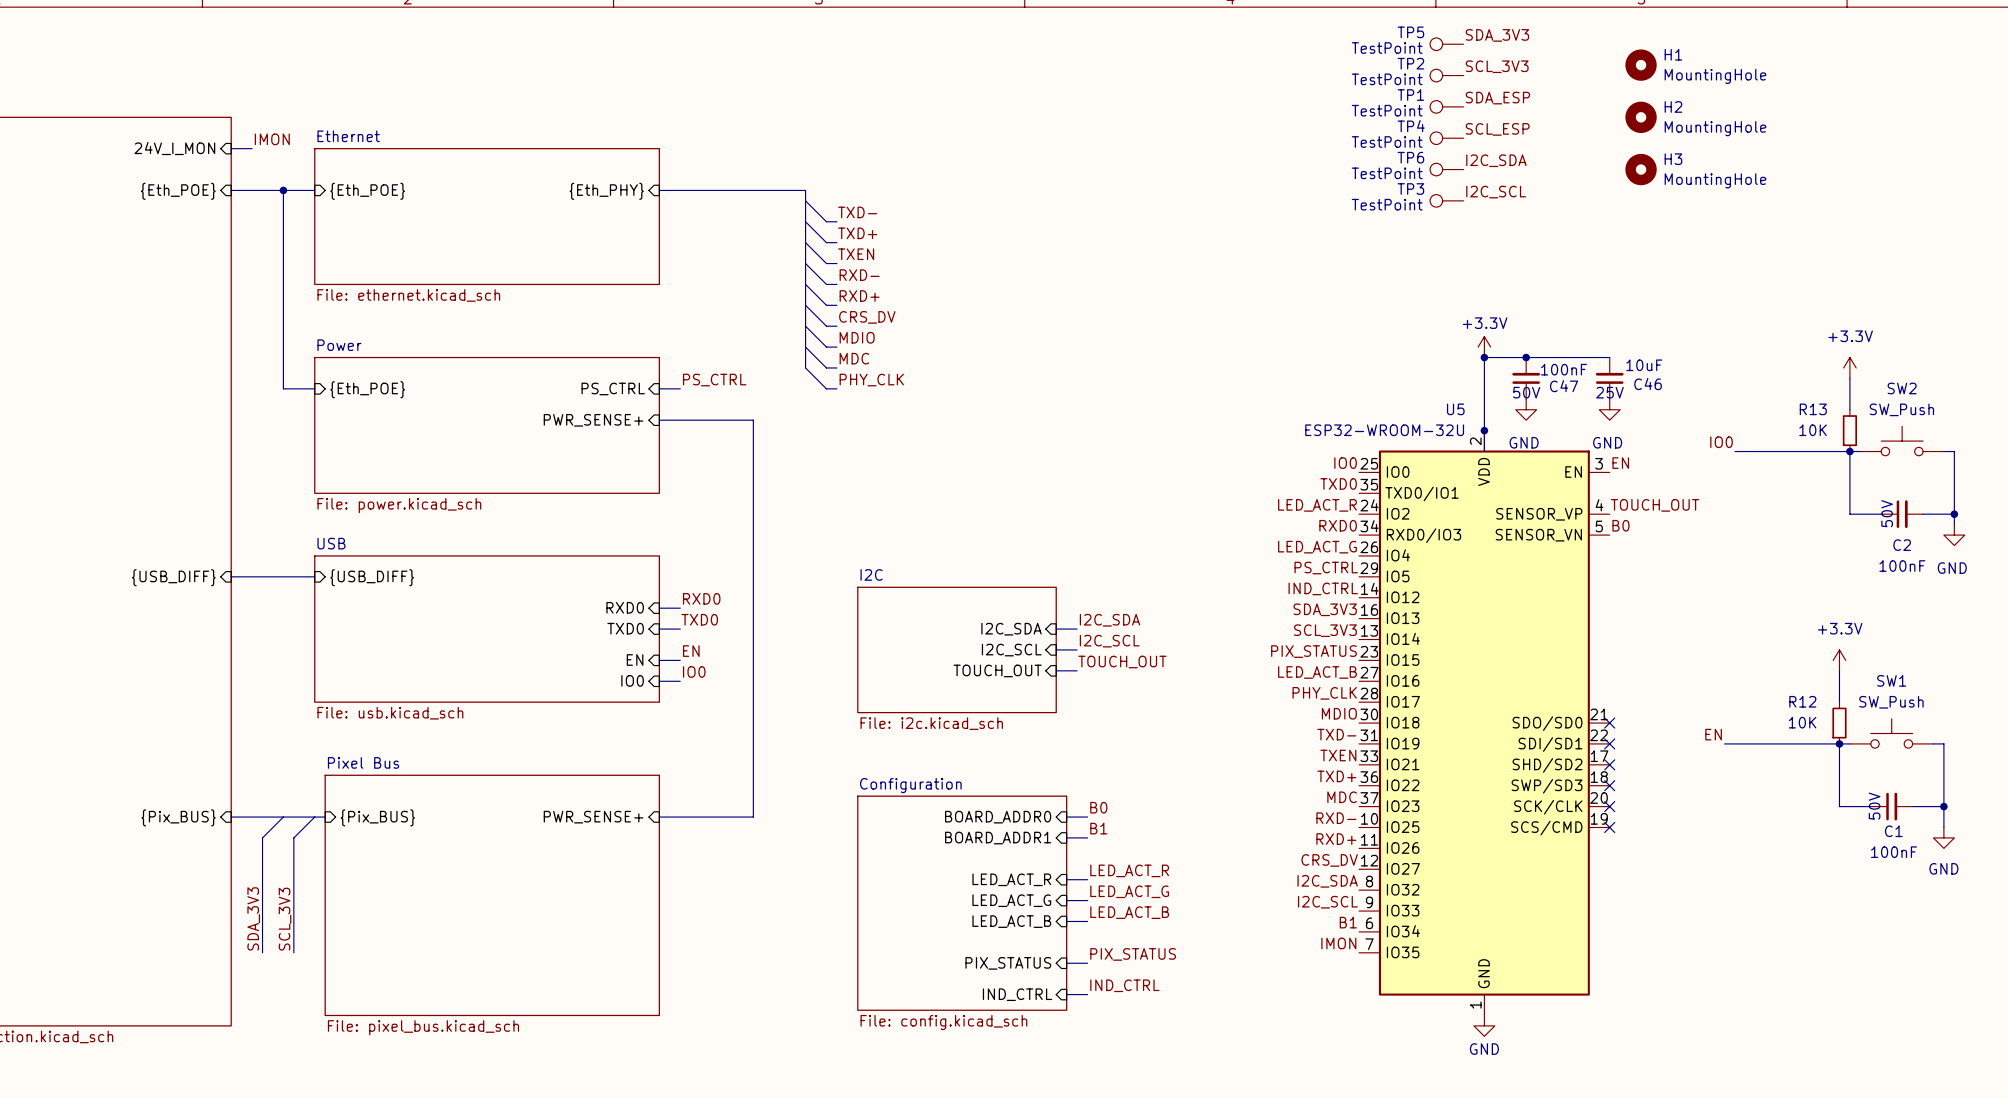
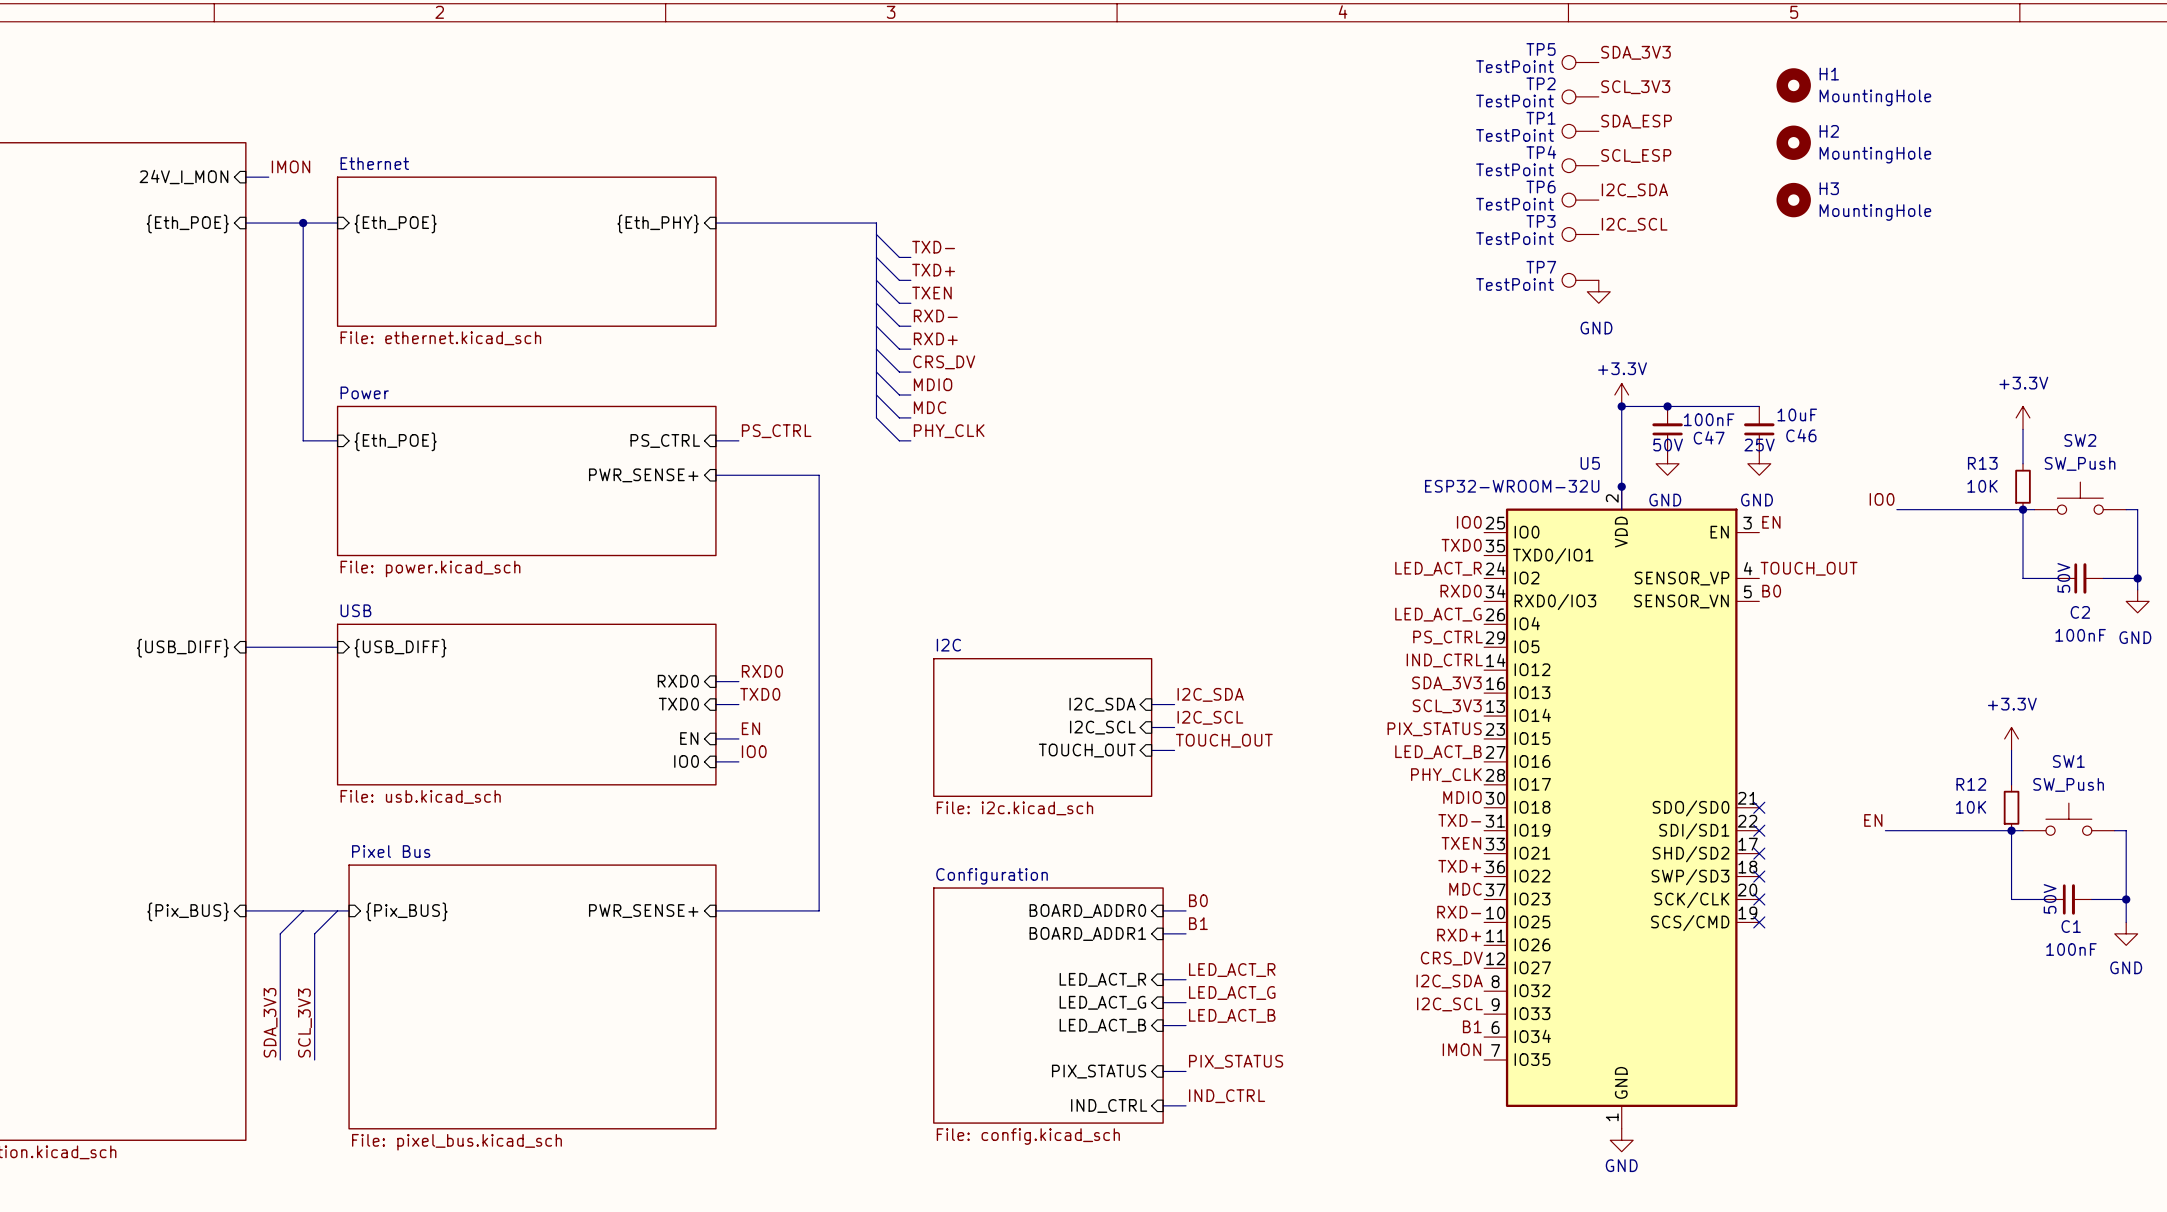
TP7: none -> TestPoint (1580, 280)
power symbol: none -> GND (1598, 291)

